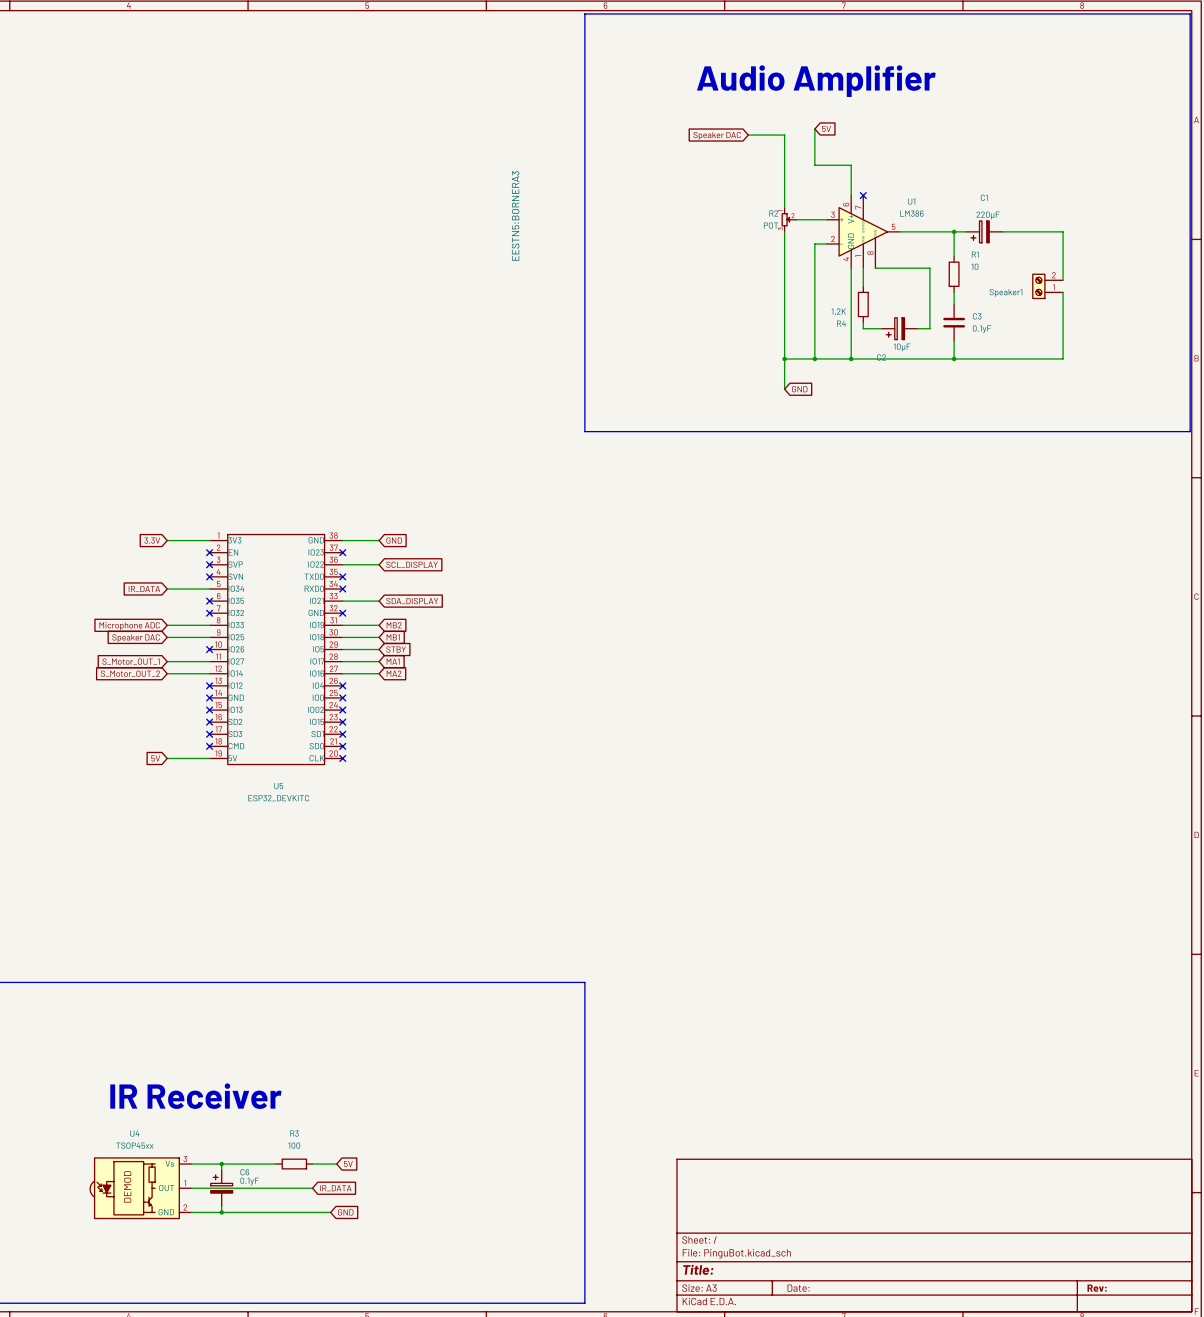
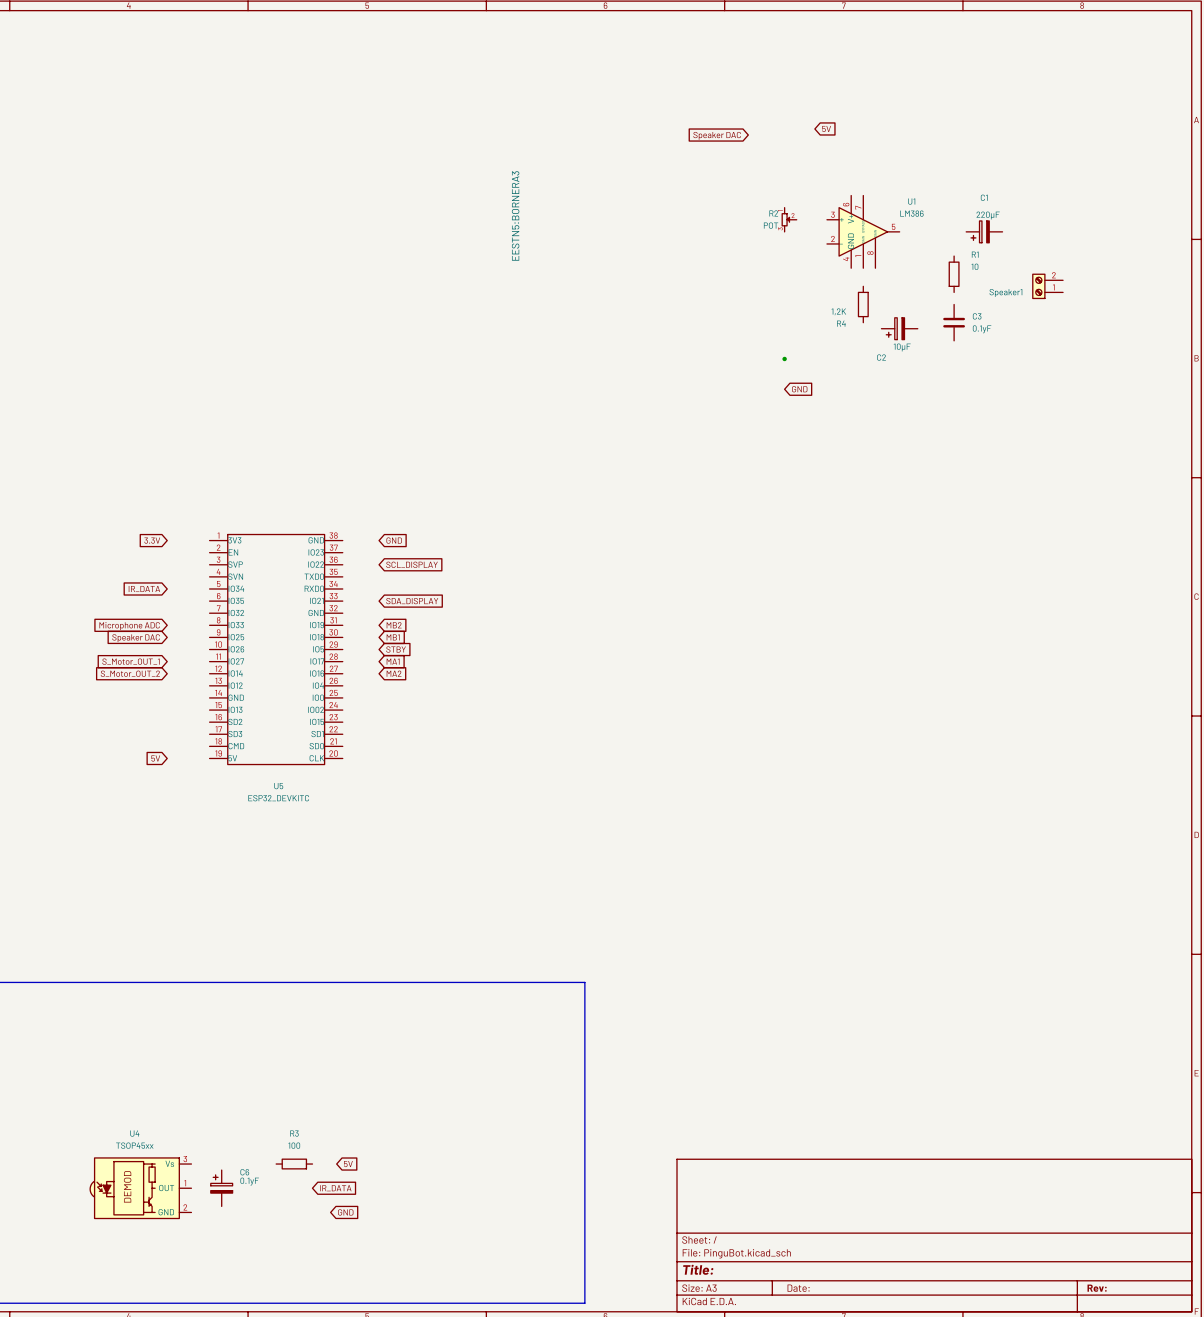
line: (584, 13) (584, 431) (1190, 431) (1190, 13) (584, 13) -> none
text: Audio Amplifier (816, 81) -> none
wire: (814, 128) (814, 165) (851, 165) (851, 195) -> none
wire: (748, 135) (784, 135) (784, 207) -> none
no-connect mark: (863, 195) -> none
wire: (796, 219) (826, 219) -> none
wire: (784, 231) (784, 389) -> none
wire: (899, 231) (966, 231) -> none
wire: (954, 231) (954, 256) -> none
junction: (954, 231) -> none
wire: (1002, 231) (1063, 231) (1063, 280) -> none
wire: (826, 243) (814, 243) (814, 358) -> none
wire: (851, 268) (851, 358) -> none
wire: (863, 268) (863, 286) -> none
wire: (875, 268) (929, 268) (929, 328) (917, 328) -> none
wire: (954, 292) (954, 304) -> none
wire: (1063, 292) (1063, 358) (784, 358) -> none
wire: (863, 322) (863, 328) (881, 328) -> none
wire: (954, 340) (954, 358) -> none
junction: (814, 358) -> none
junction: (851, 358) -> none
junction: (954, 358) -> none
wire: (167, 540) (209, 540) -> none
wire: (342, 540) (379, 540) -> none
no-connect mark: (209, 552) -> none
no-connect mark: (342, 552) -> none
no-connect mark: (209, 564) -> none
wire: (342, 564) (379, 564) -> none
no-connect mark: (209, 576) -> none
no-connect mark: (342, 576) -> none
wire: (167, 588) (209, 588) -> none
no-connect mark: (342, 588) -> none
no-connect mark: (209, 601) -> none
wire: (342, 601) (379, 601) -> none
no-connect mark: (209, 613) -> none
no-connect mark: (342, 613) -> none
wire: (167, 625) (209, 625) -> none
wire: (342, 625) (379, 625) -> none
wire: (167, 637) (209, 637) -> none
wire: (342, 637) (379, 637) -> none
no-connect mark: (209, 649) -> none
wire: (342, 649) (379, 649) -> none
wire: (167, 661) (209, 661) -> none
wire: (342, 661) (379, 661) -> none
wire: (167, 673) (209, 673) -> none
wire: (342, 673) (379, 673) -> none
no-connect mark: (209, 685) -> none
no-connect mark: (342, 685) -> none
no-connect mark: (209, 697) -> none
no-connect mark: (342, 697) -> none
no-connect mark: (209, 710) -> none
no-connect mark: (342, 710) -> none
no-connect mark: (209, 722) -> none
no-connect mark: (342, 722) -> none
no-connect mark: (209, 734) -> none
no-connect mark: (342, 734) -> none
no-connect mark: (209, 746) -> none
no-connect mark: (342, 746) -> none
wire: (167, 758) (209, 758) -> none
no-connect mark: (342, 758) -> none
text: IR Receiver (195, 1096) -> none
wire: (191, 1164) (276, 1164) -> none
wire: (221, 1164) (221, 1170) -> none
junction: (221, 1164) -> none
wire: (312, 1164) (336, 1164) -> none
wire: (191, 1188) (312, 1188) -> none
wire: (221, 1206) (221, 1212) -> none
wire: (191, 1212) (330, 1212) -> none
junction: (221, 1212) -> none

